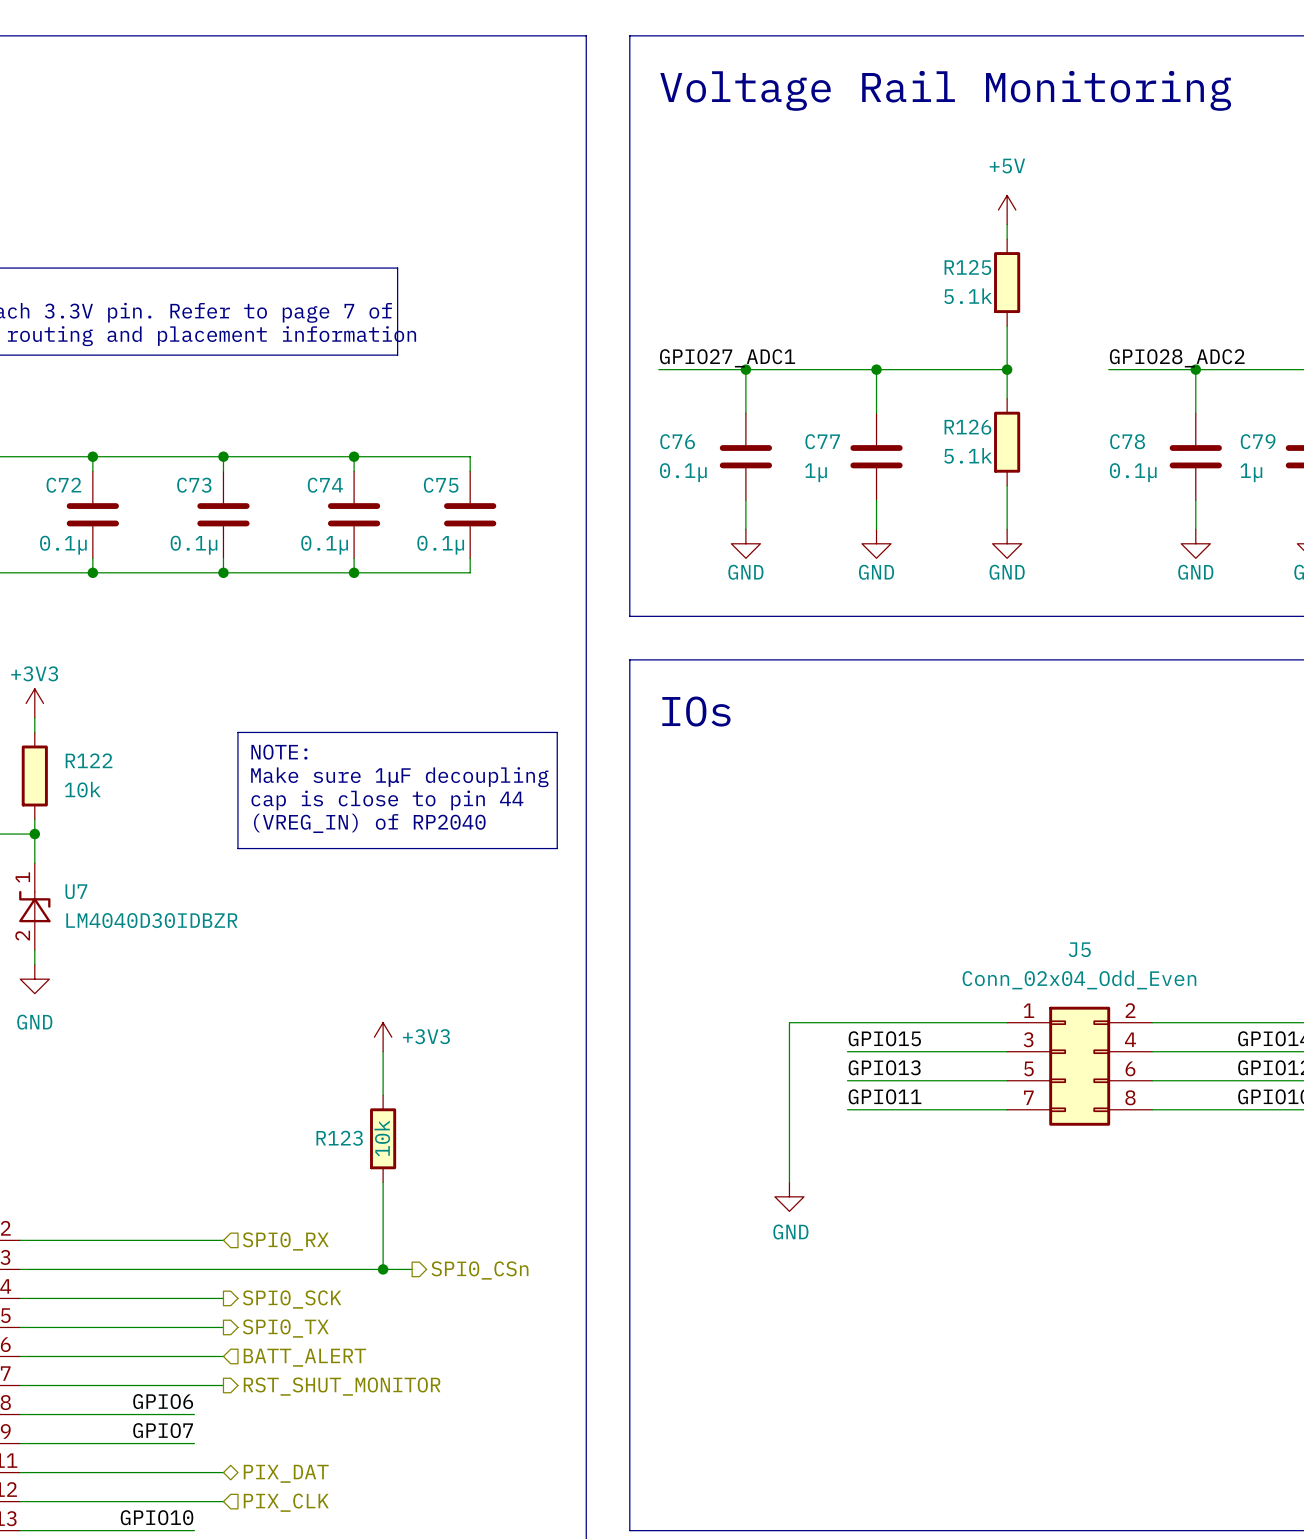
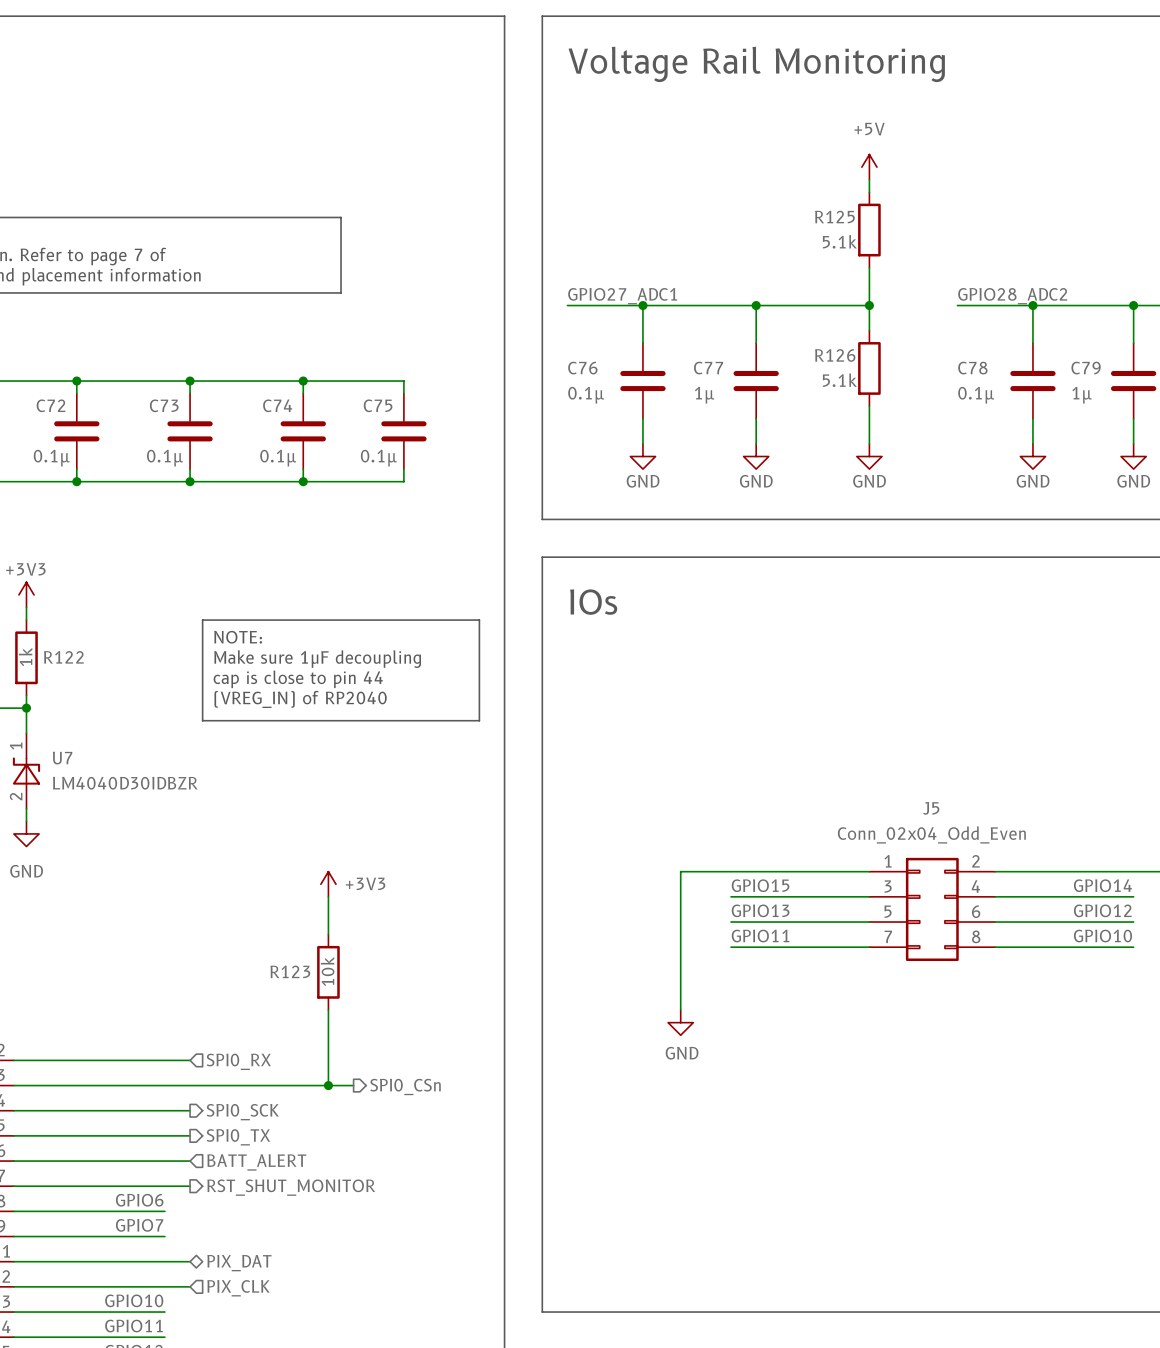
R122 name position: R122 (89, 760) -> R122 (63, 657)
R122 value: 10k (82, 789) -> 1k (25, 656)

